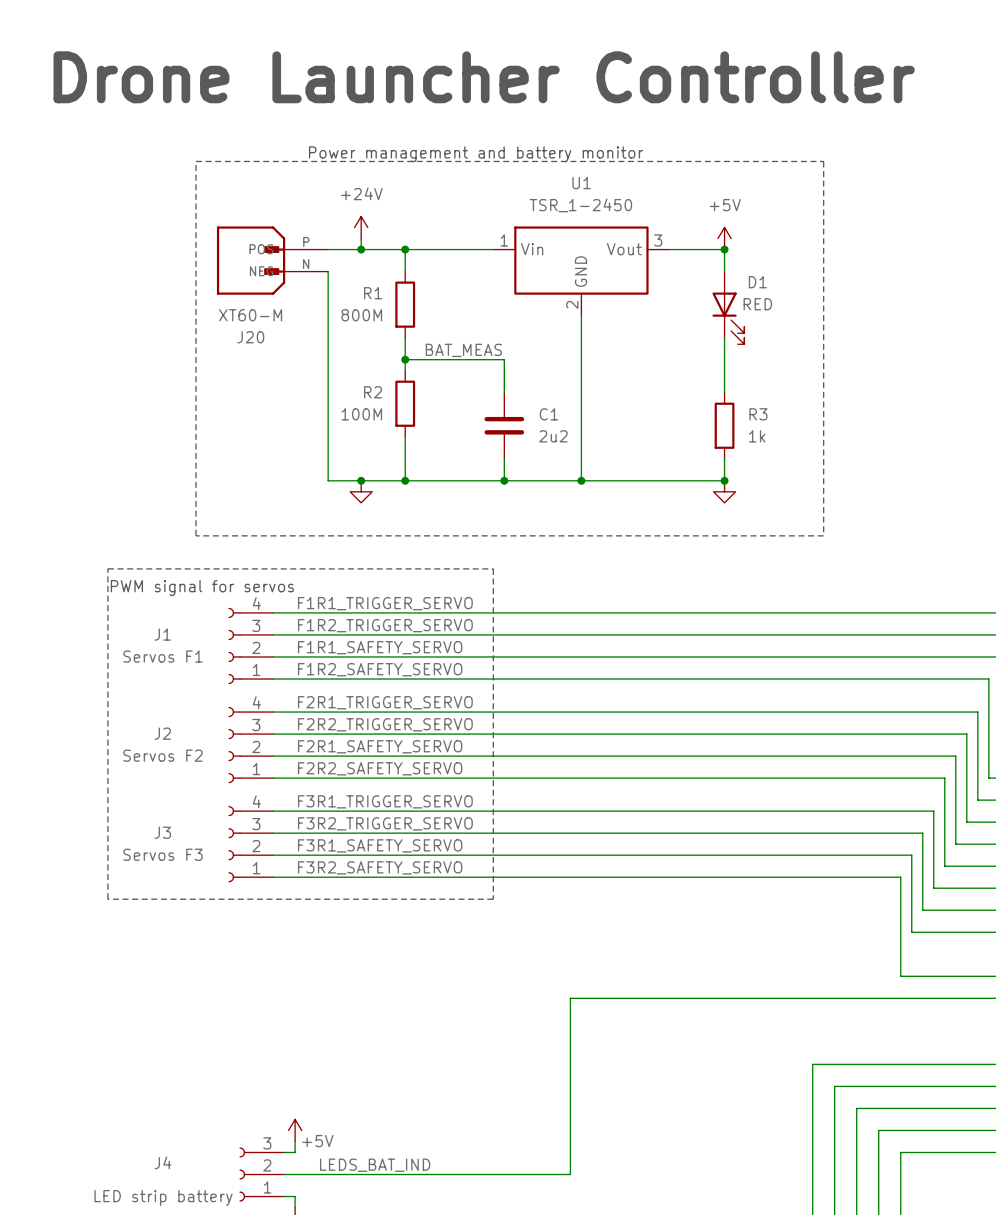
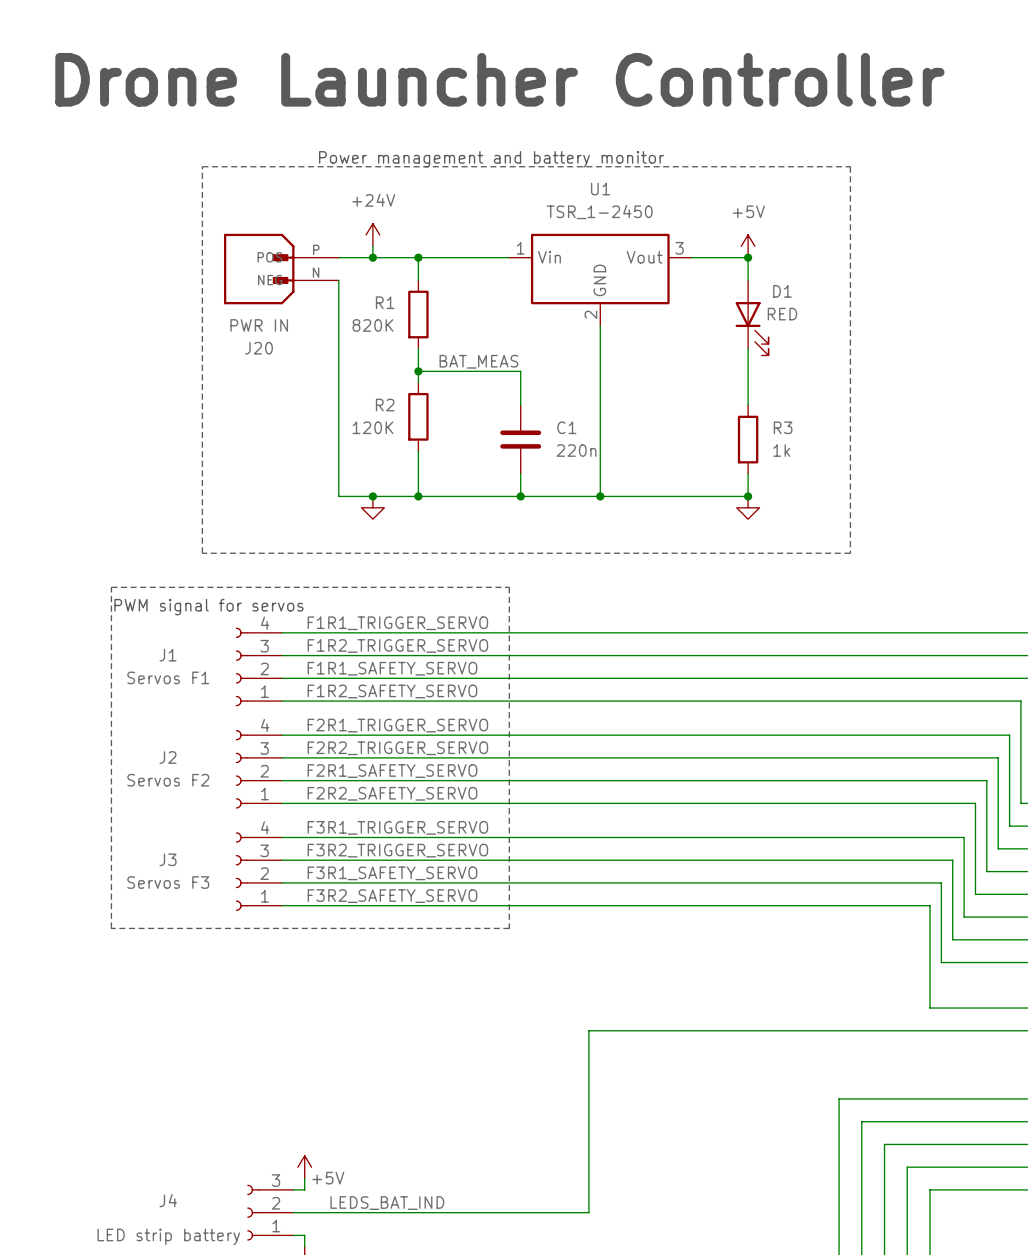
J20 value: XT60-M (250, 315) -> PWR IN (259, 325)
R1 value: 800M (361, 315) -> 820K (373, 325)
R2 value: 100M (361, 414) -> 120K (373, 427)
C1 value: 2u2 (553, 436) -> 220n (576, 450)

